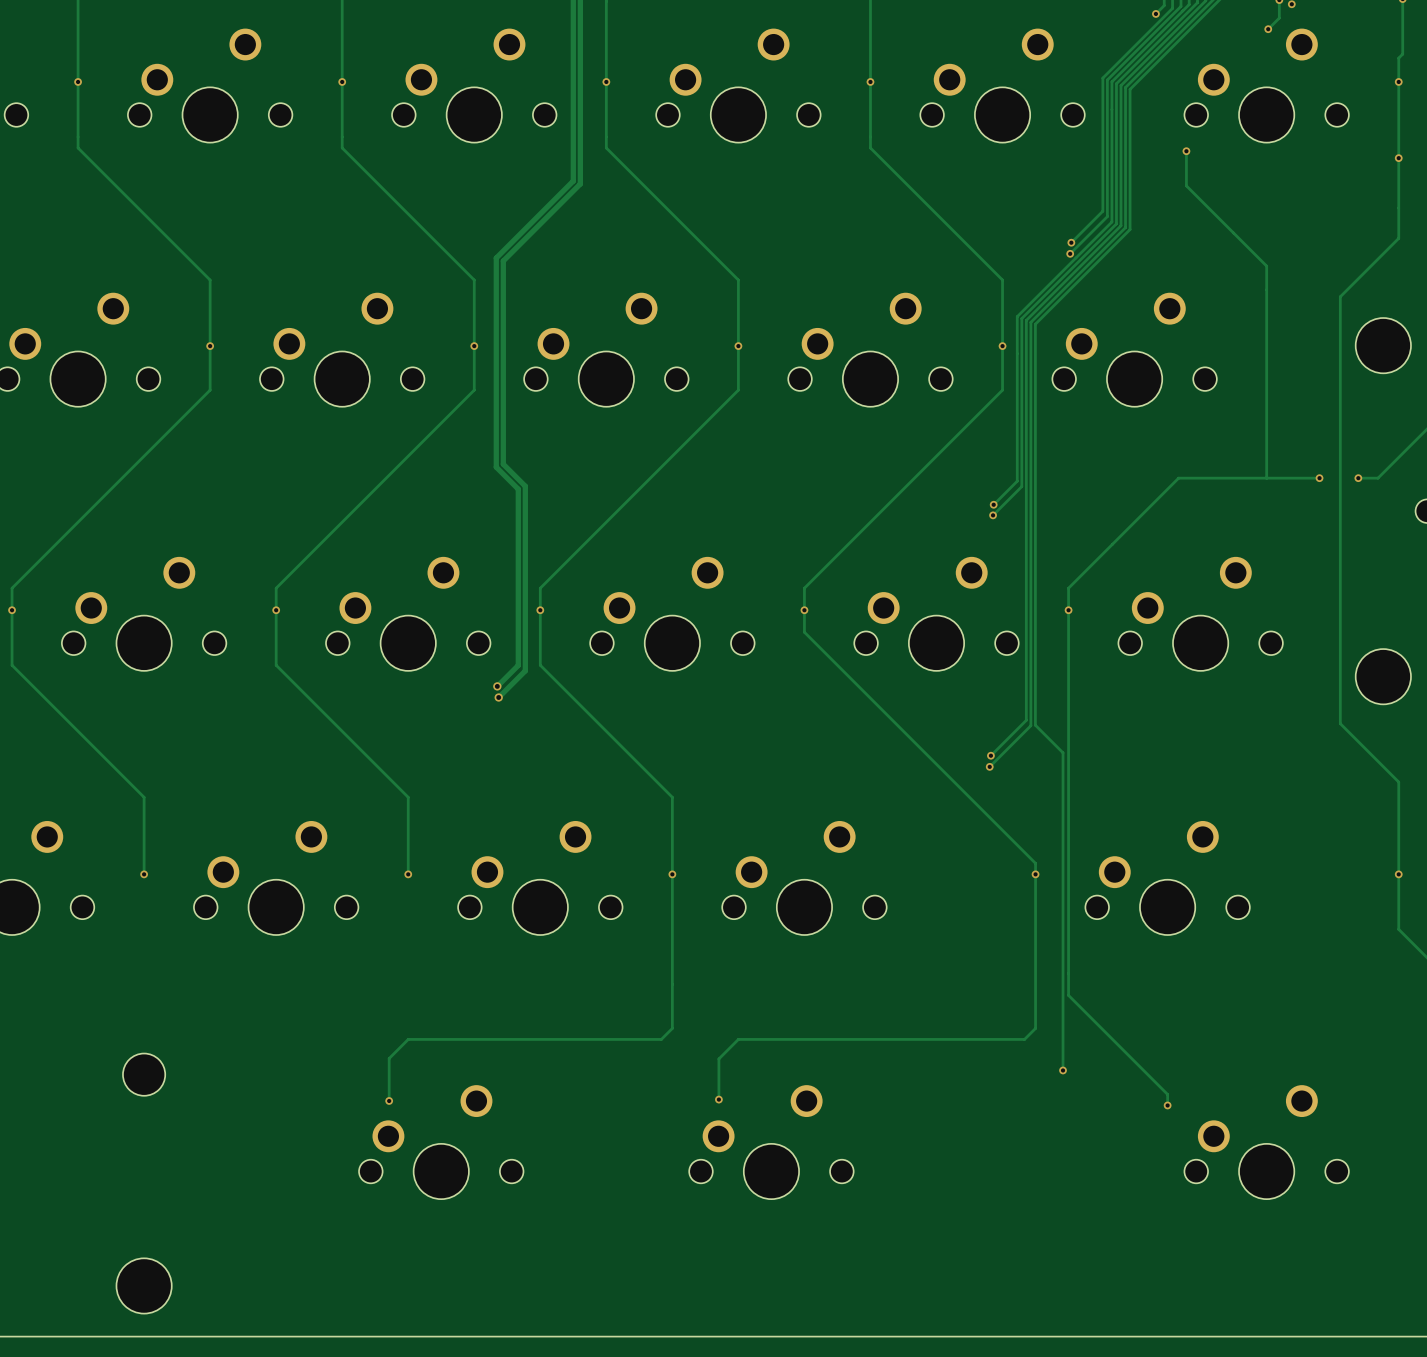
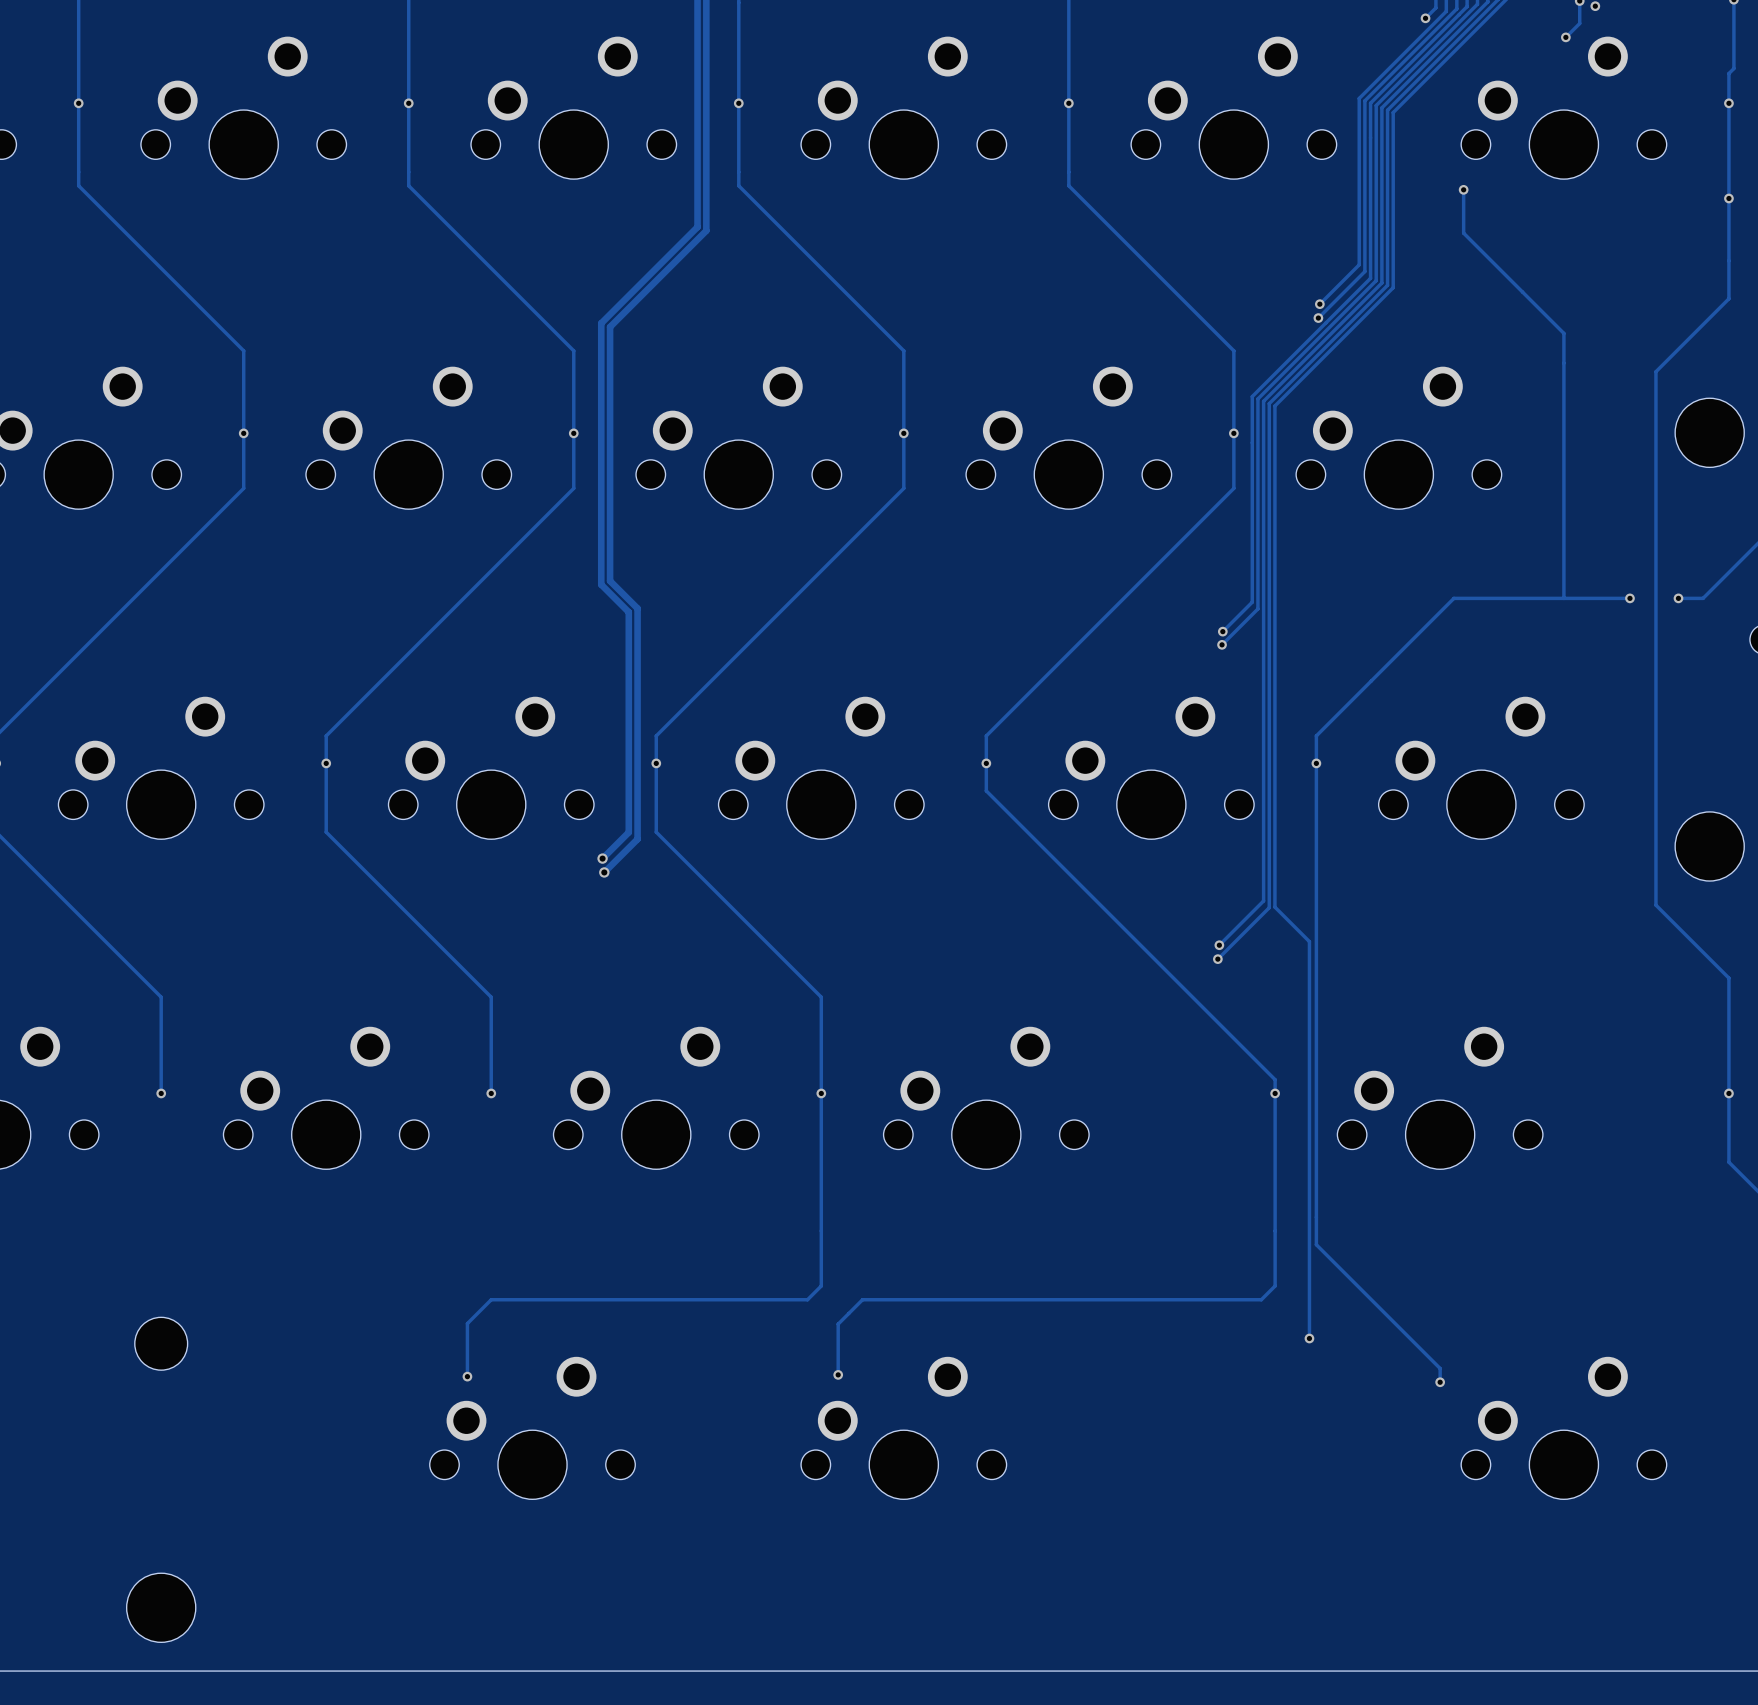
track: (738, 1039) (718, 1058) (718, 1099) -> (903, 1299) (862, 1299) (838, 1324) (838, 1374)
via position: (718, 1099) -> (838, 1374)
part position: (771, 1142) -> (903, 1428)

